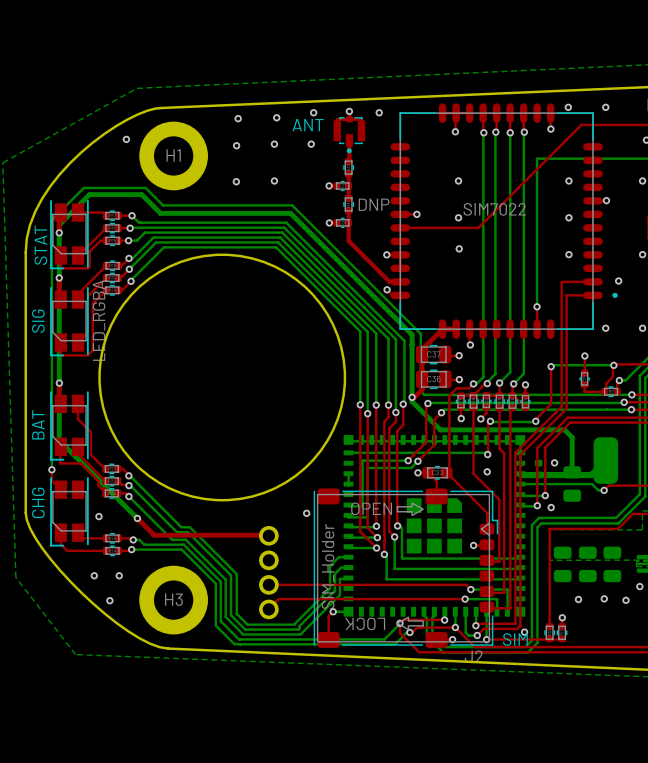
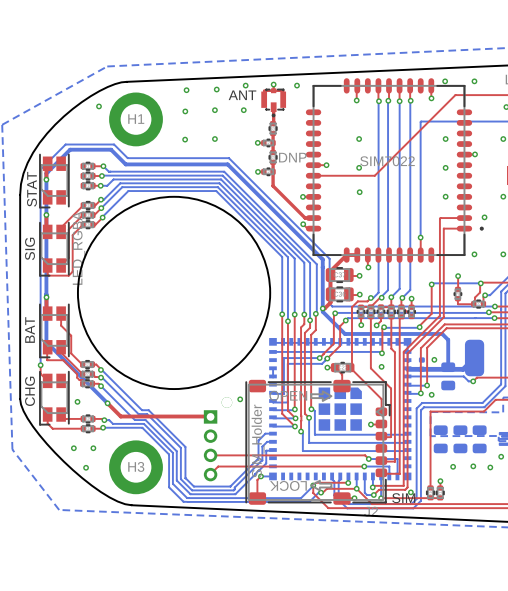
top track: (78, 212) (102, 212) (106, 215) -> none
top track: (106, 228) (78, 255) -> none
top track: (106, 240) (100, 240) (89, 251) (89, 266) (87, 268) (62, 268) (60, 255) -> none
part: none -> (218, 439)
part: (268, 572) -> none

